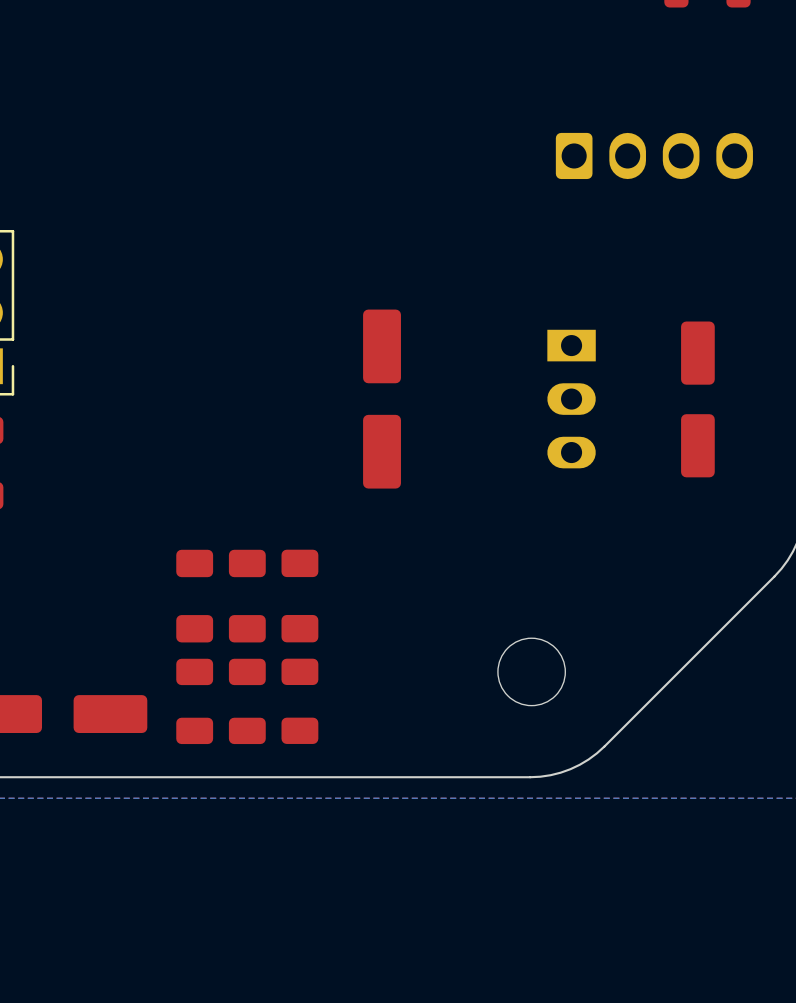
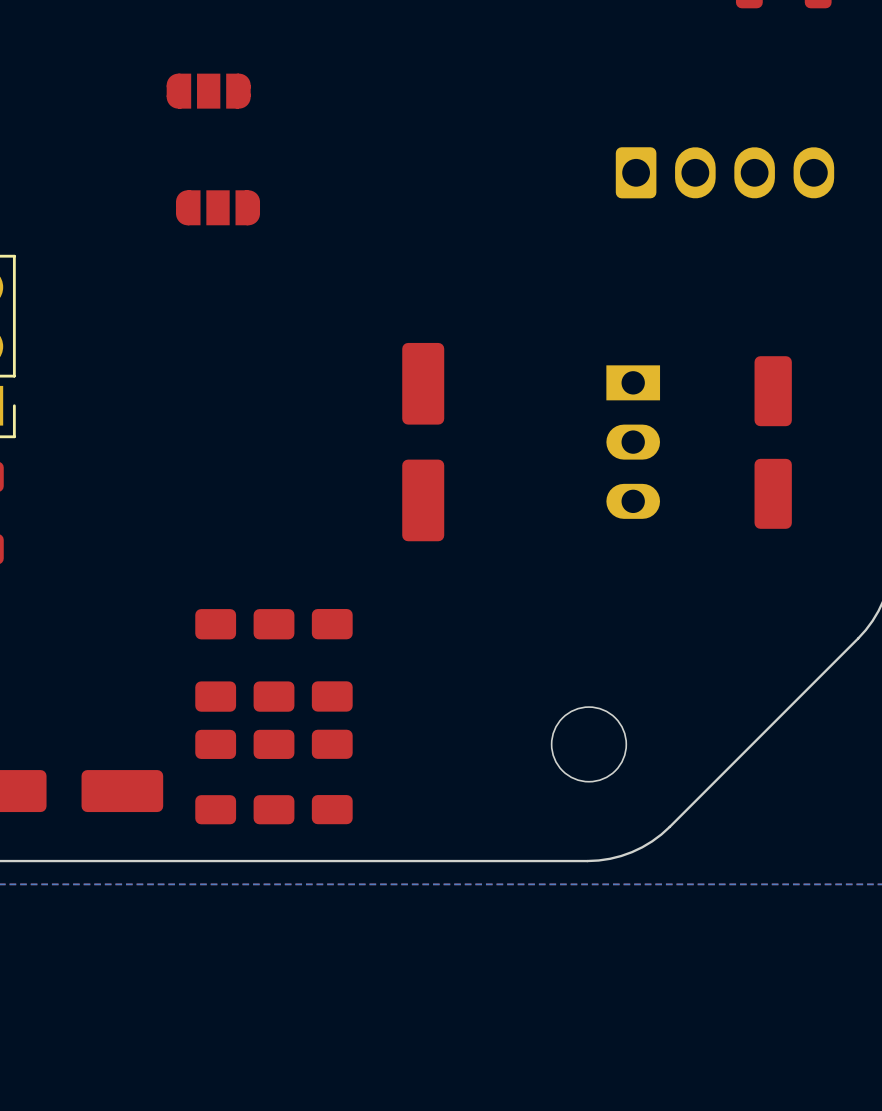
part: none -> (208, 91)
part: none -> (218, 207)

